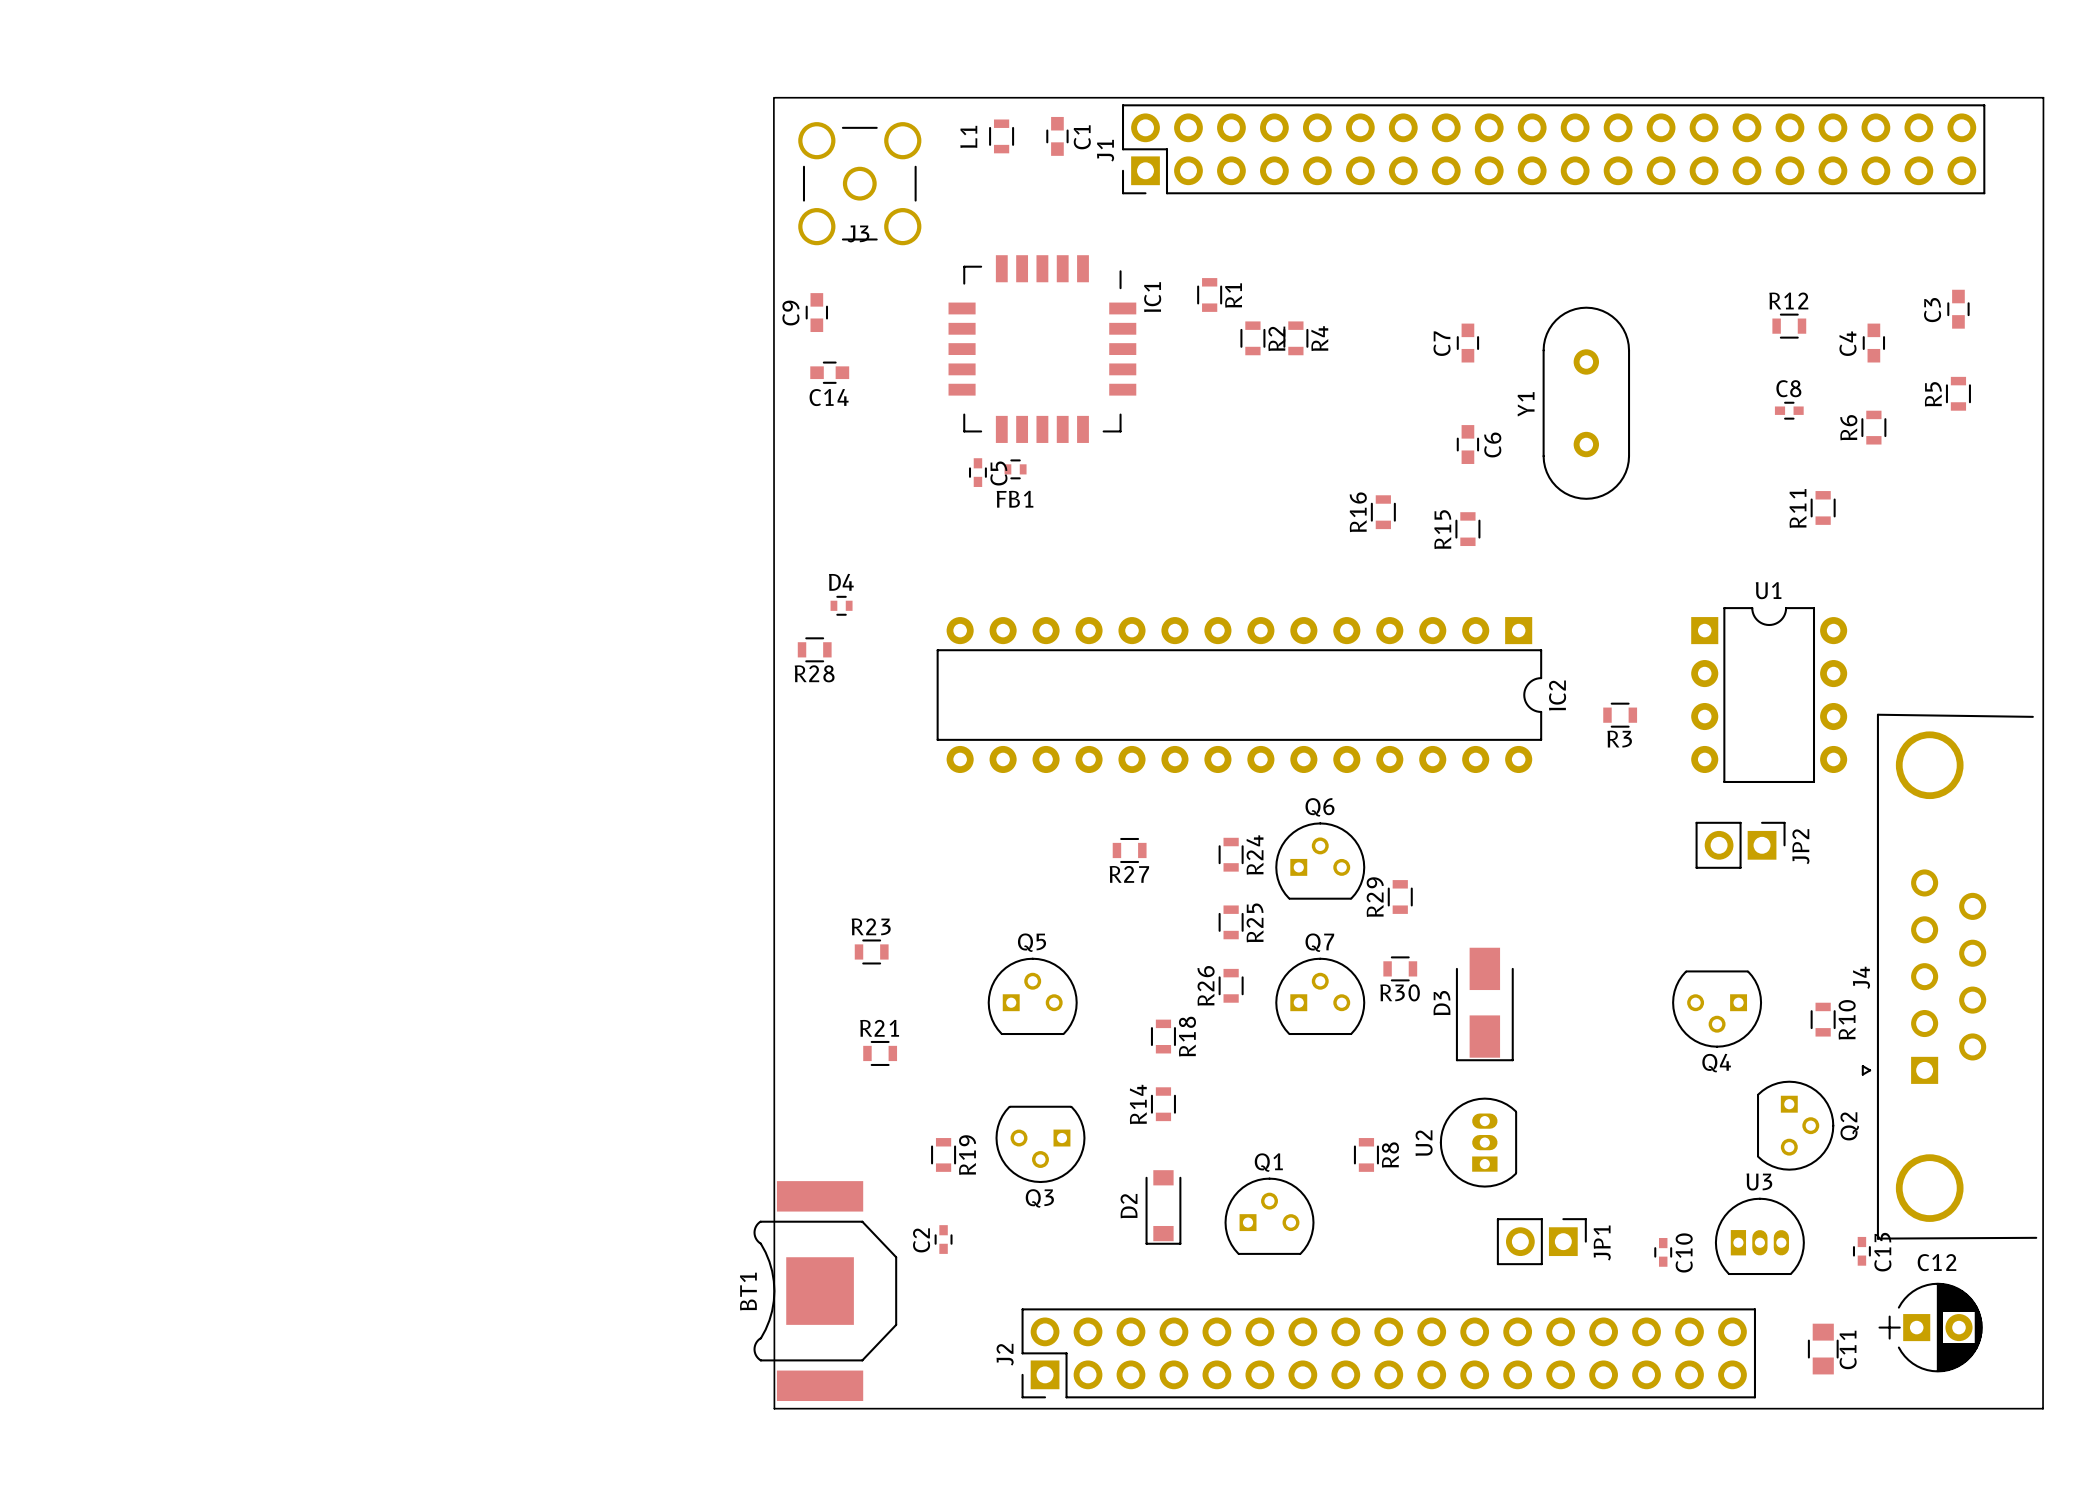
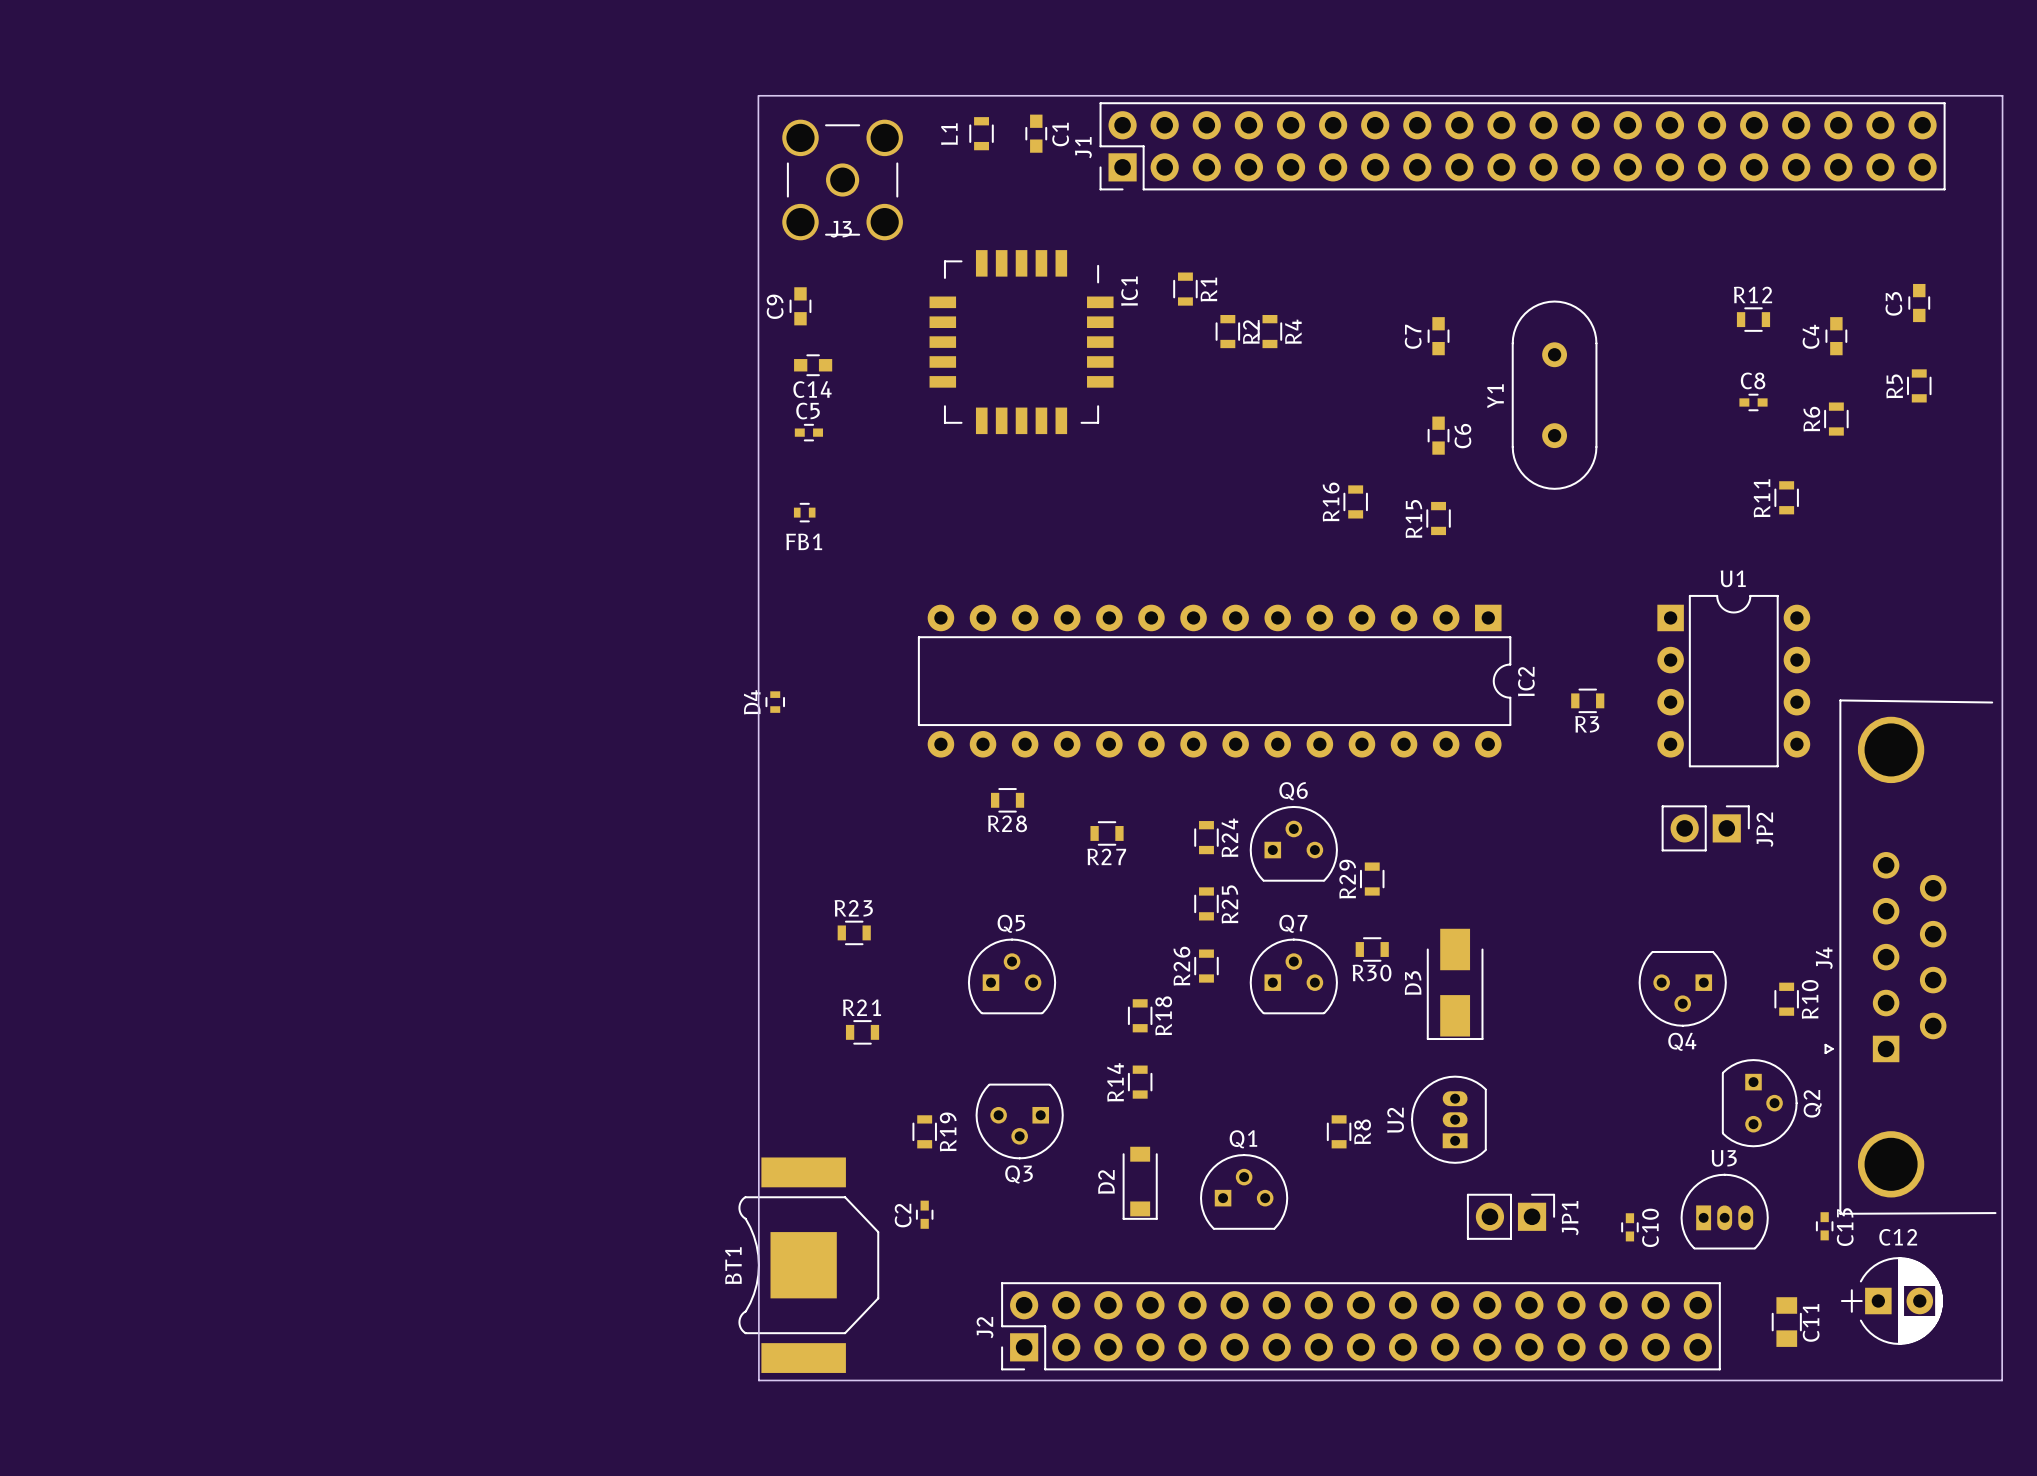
FB1 position: (1015, 469) -> (804, 512)
C5 rotation: 0° (977, 472) -> 90° clockwise (808, 432)
C5 position: (977, 472) -> (808, 432)
D4 rotation: 0° (841, 605) -> 90° clockwise (775, 702)
D4 position: (841, 605) -> (775, 702)
R28 position: (814, 649) -> (1007, 800)

